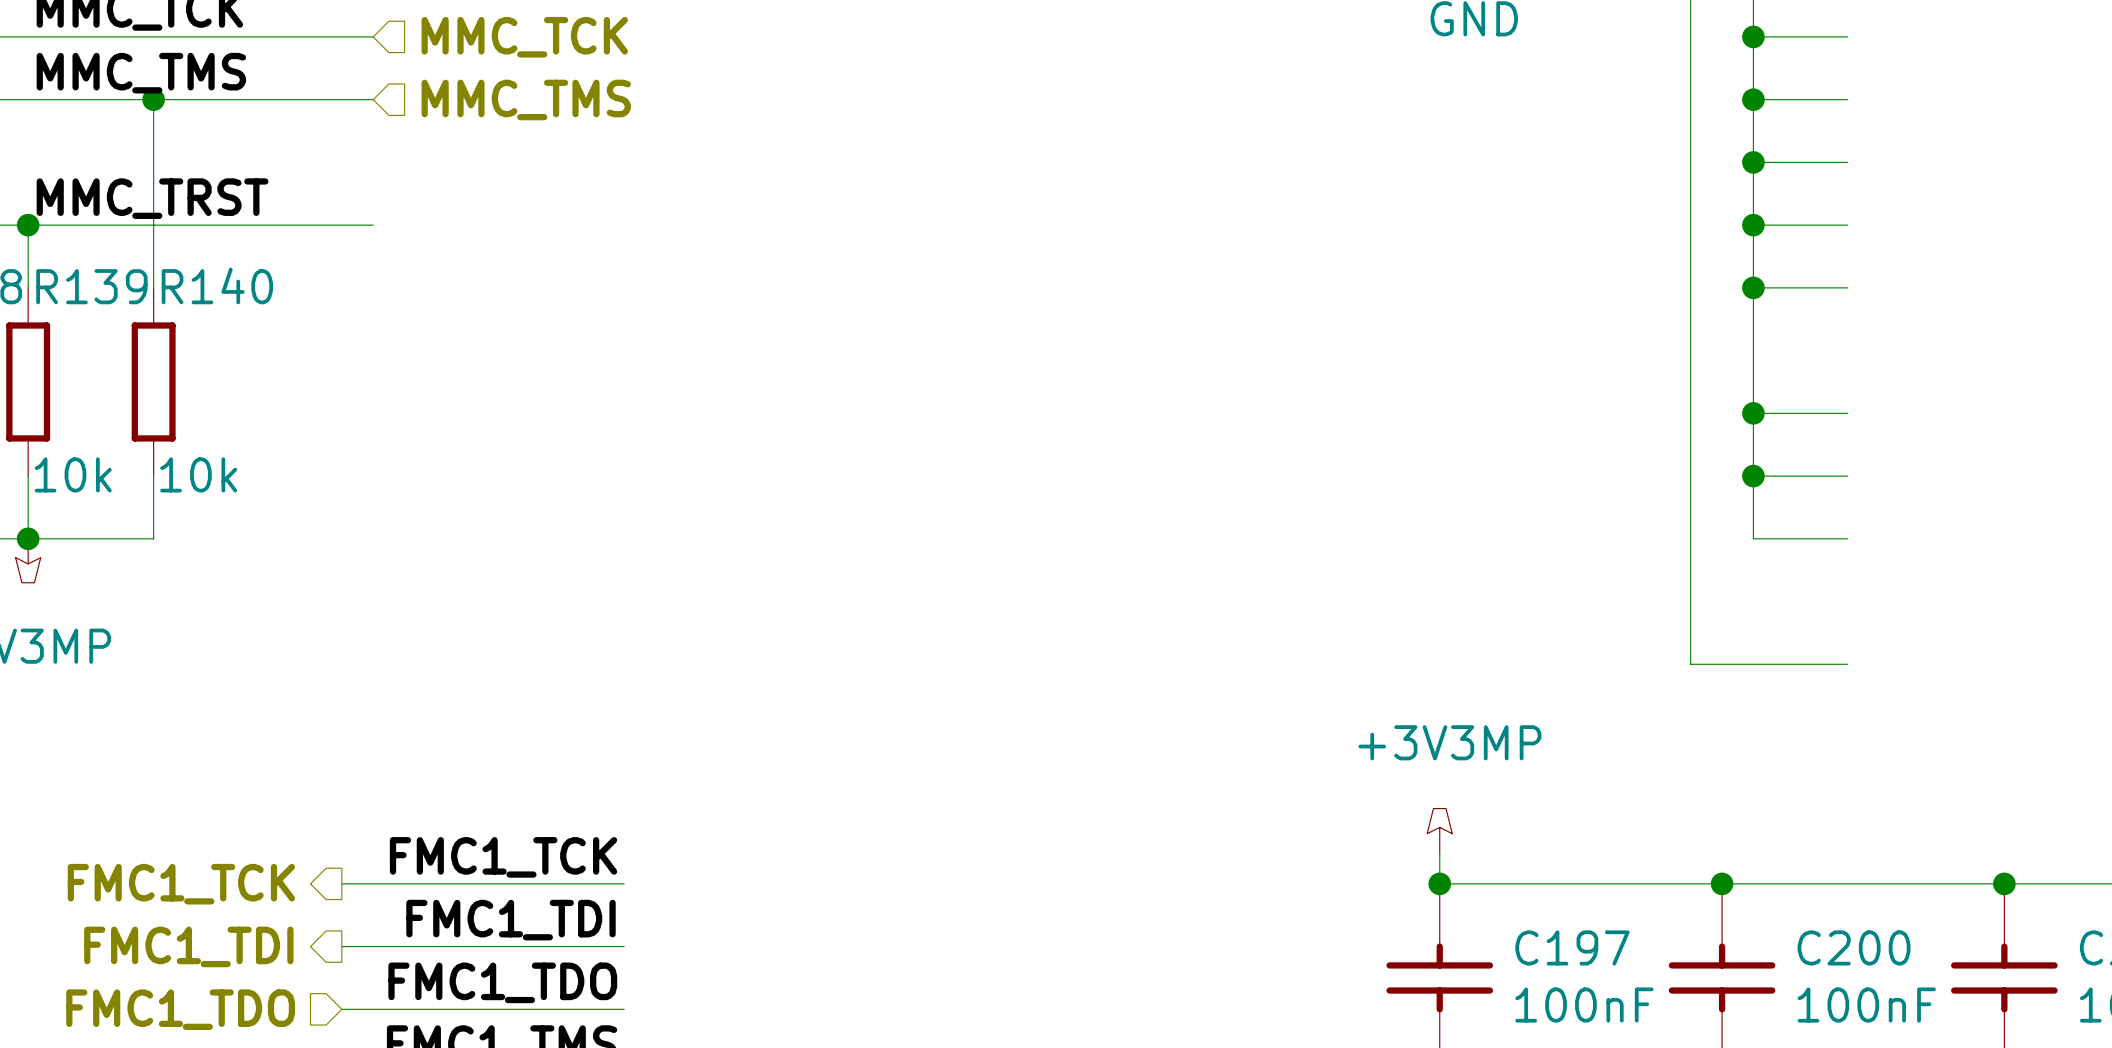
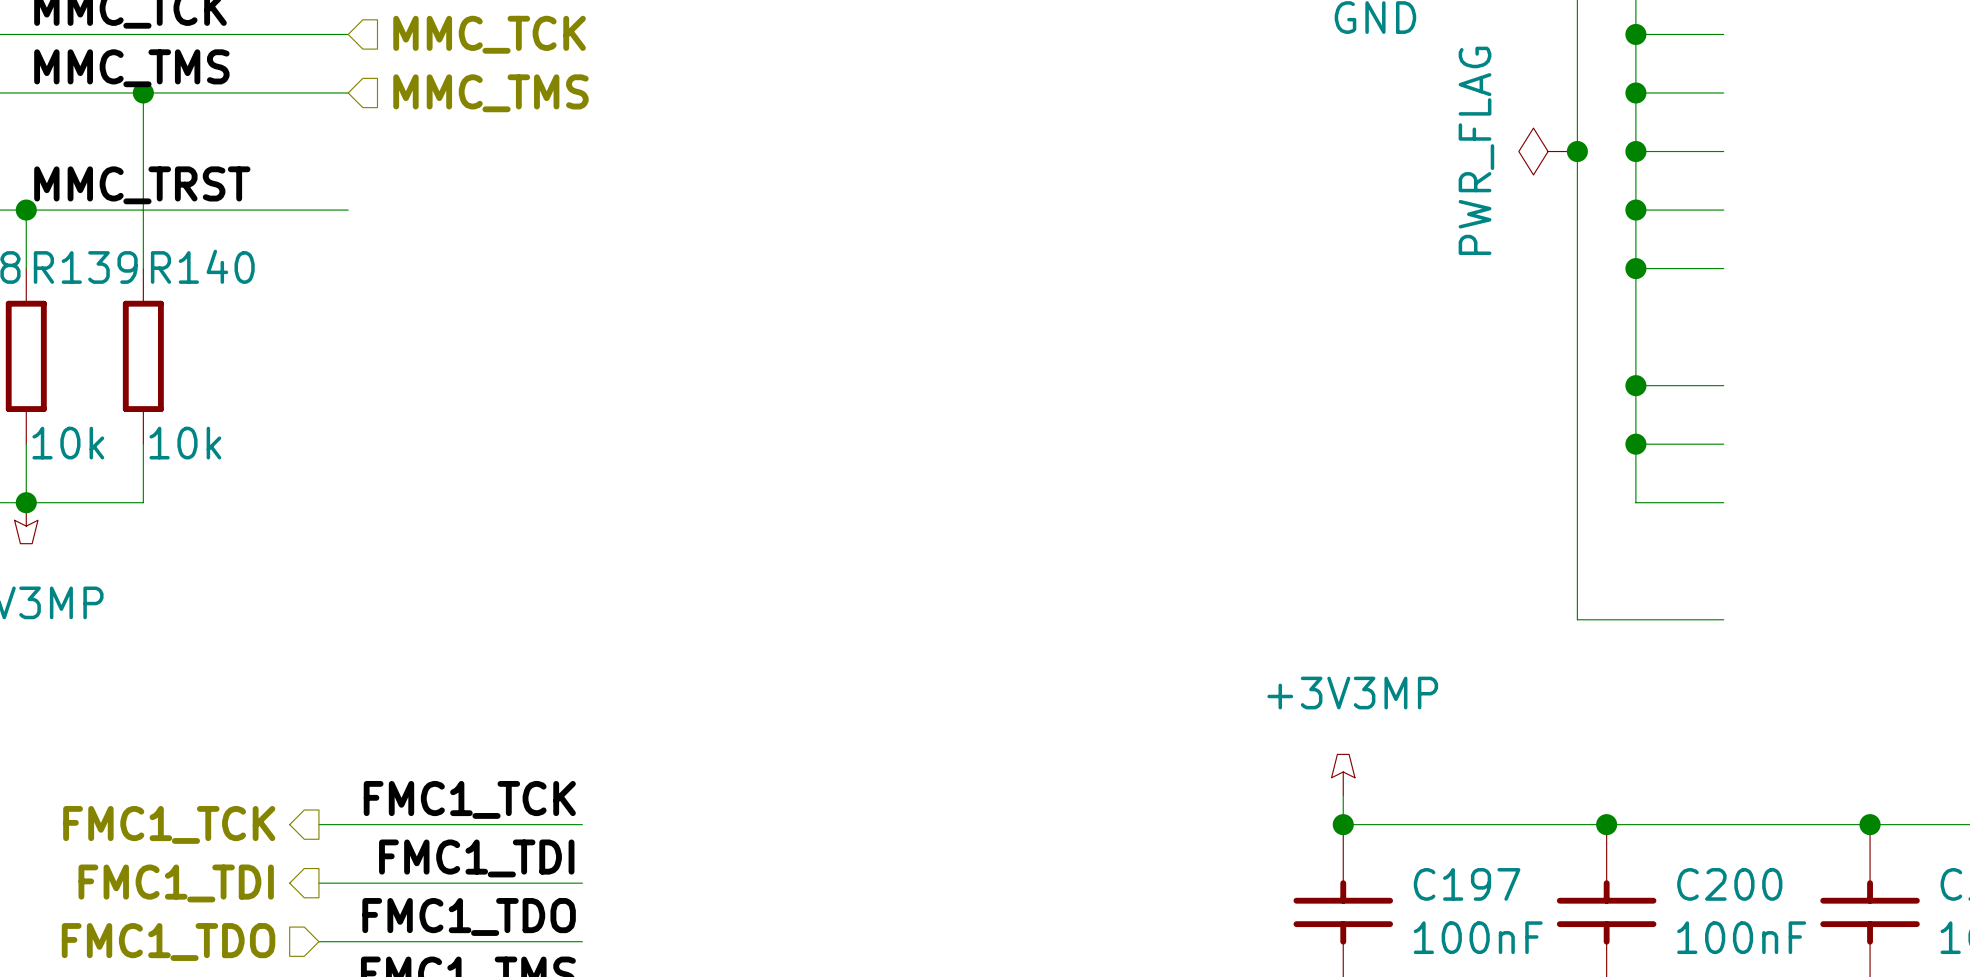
power symbol: none -> PWR_FLAG (1548, 151)
junction: none -> (1577, 151)

